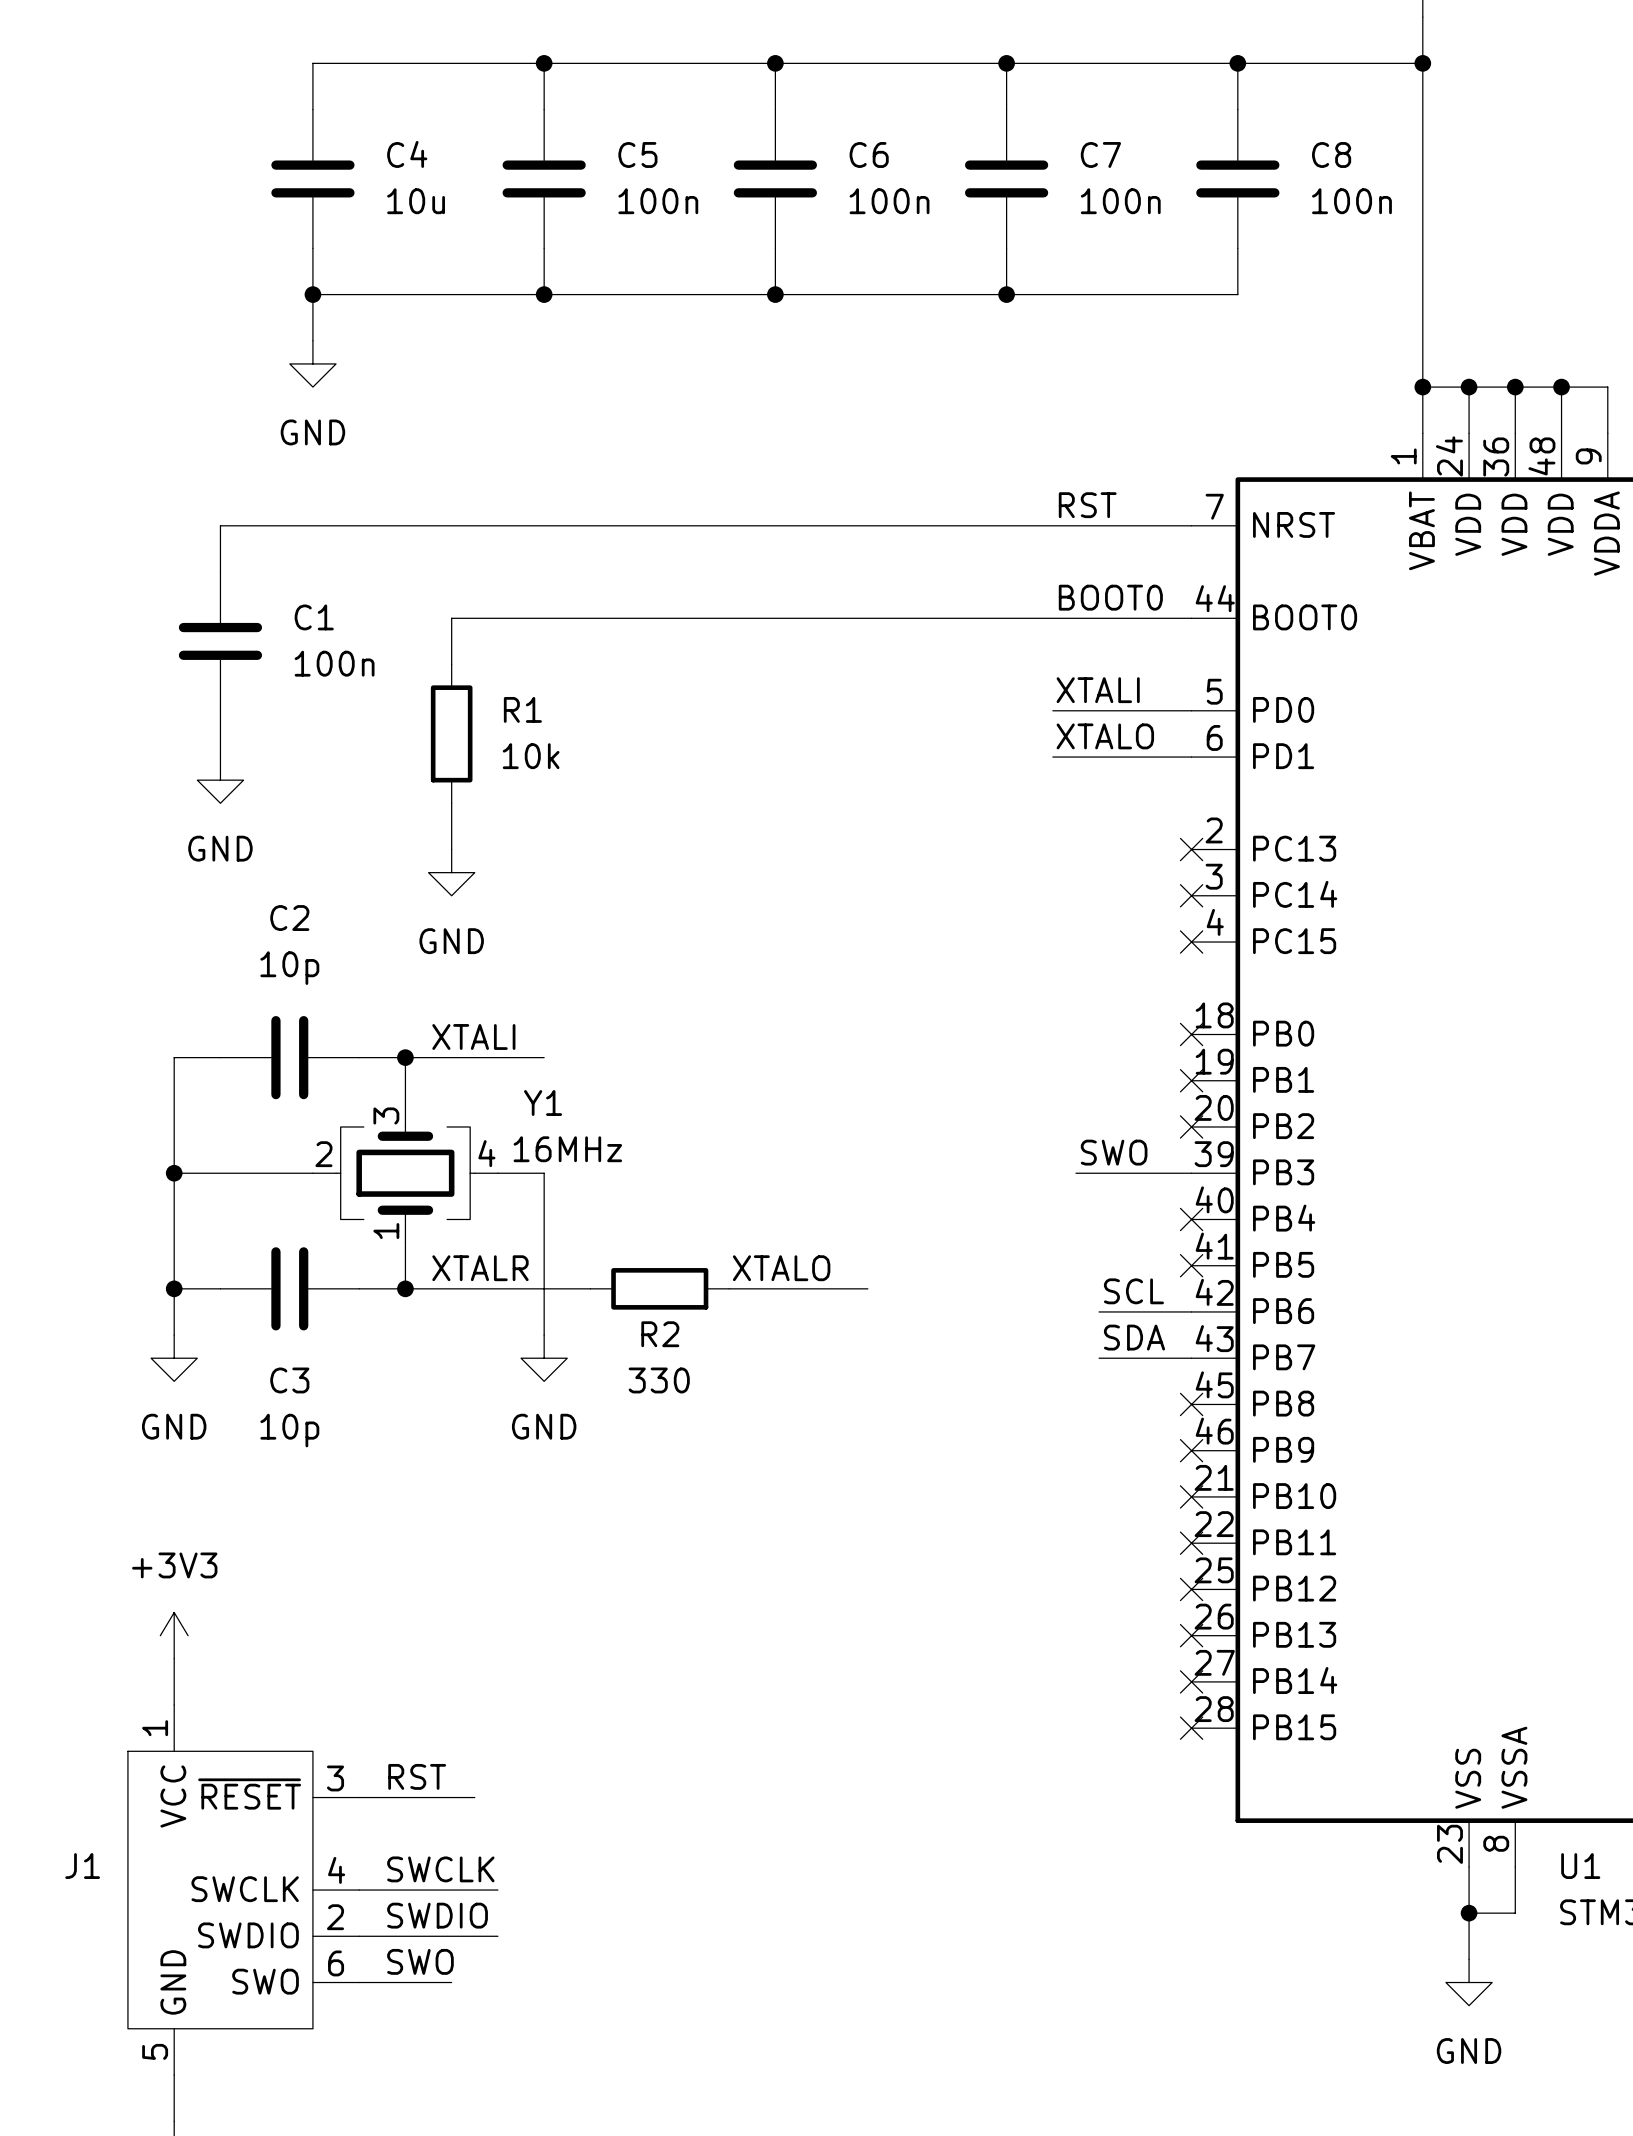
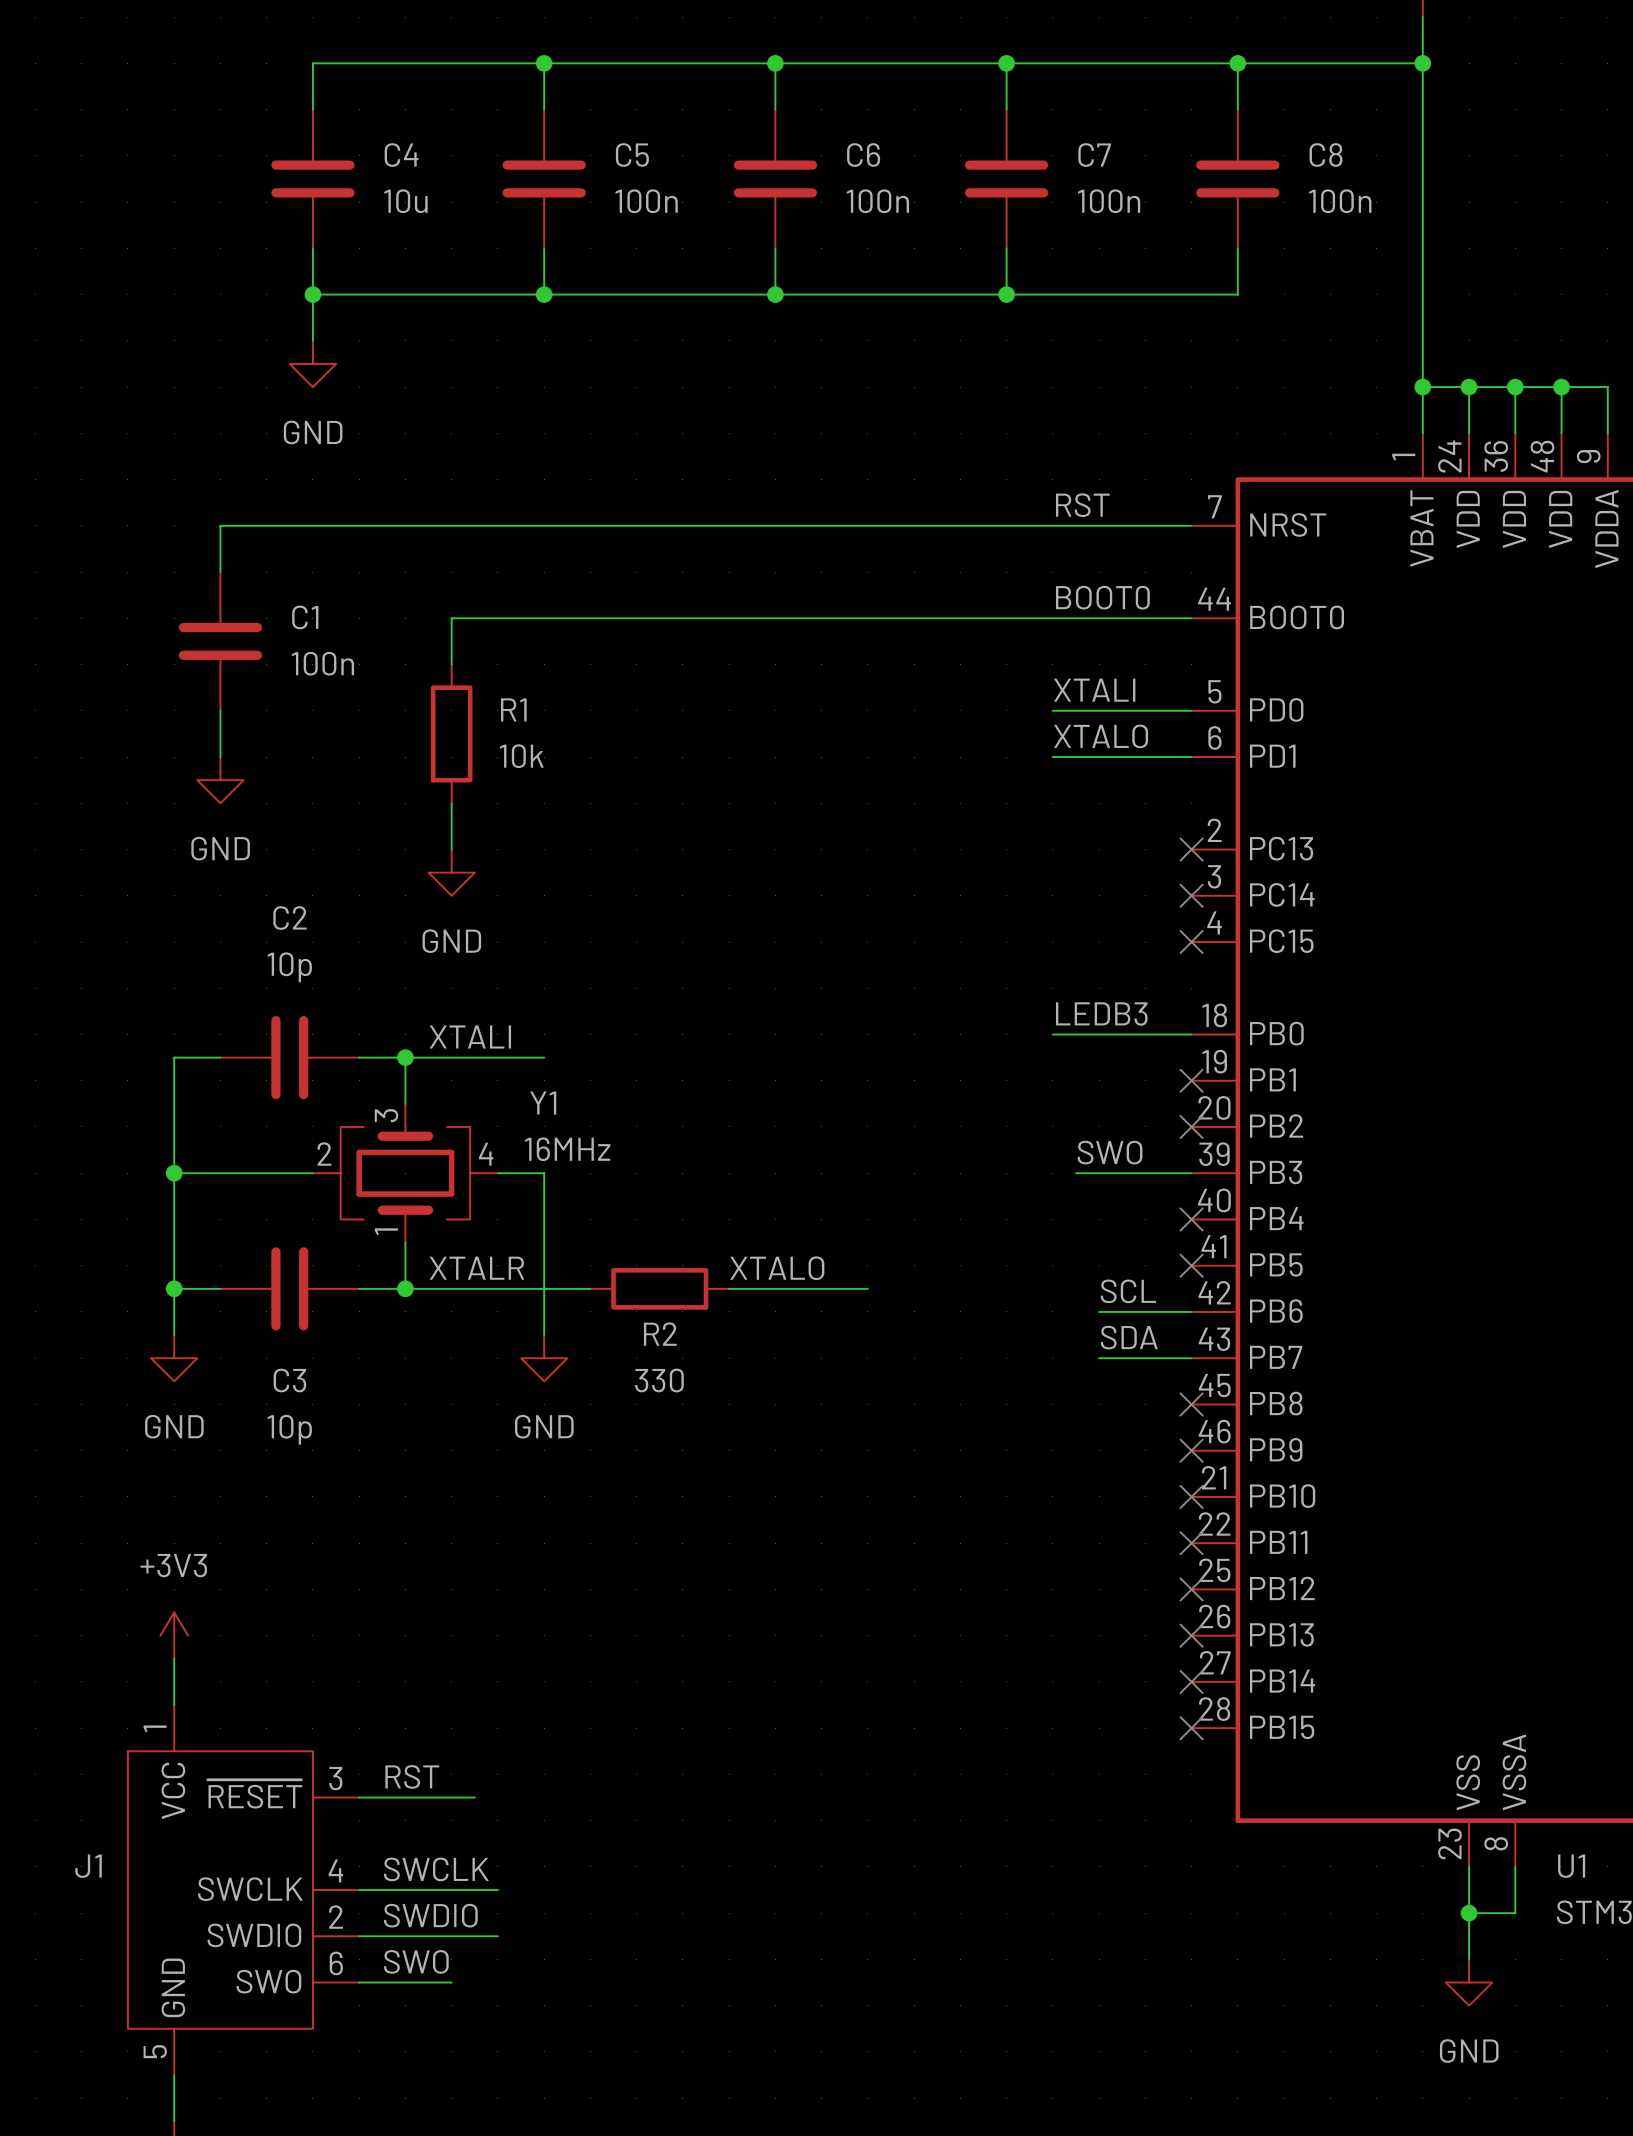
label: none -> LEDB3 (1101, 1014)
wire: none -> (1052, 1034) (1191, 1034)
no-connect mark: (1191, 1034) -> none

